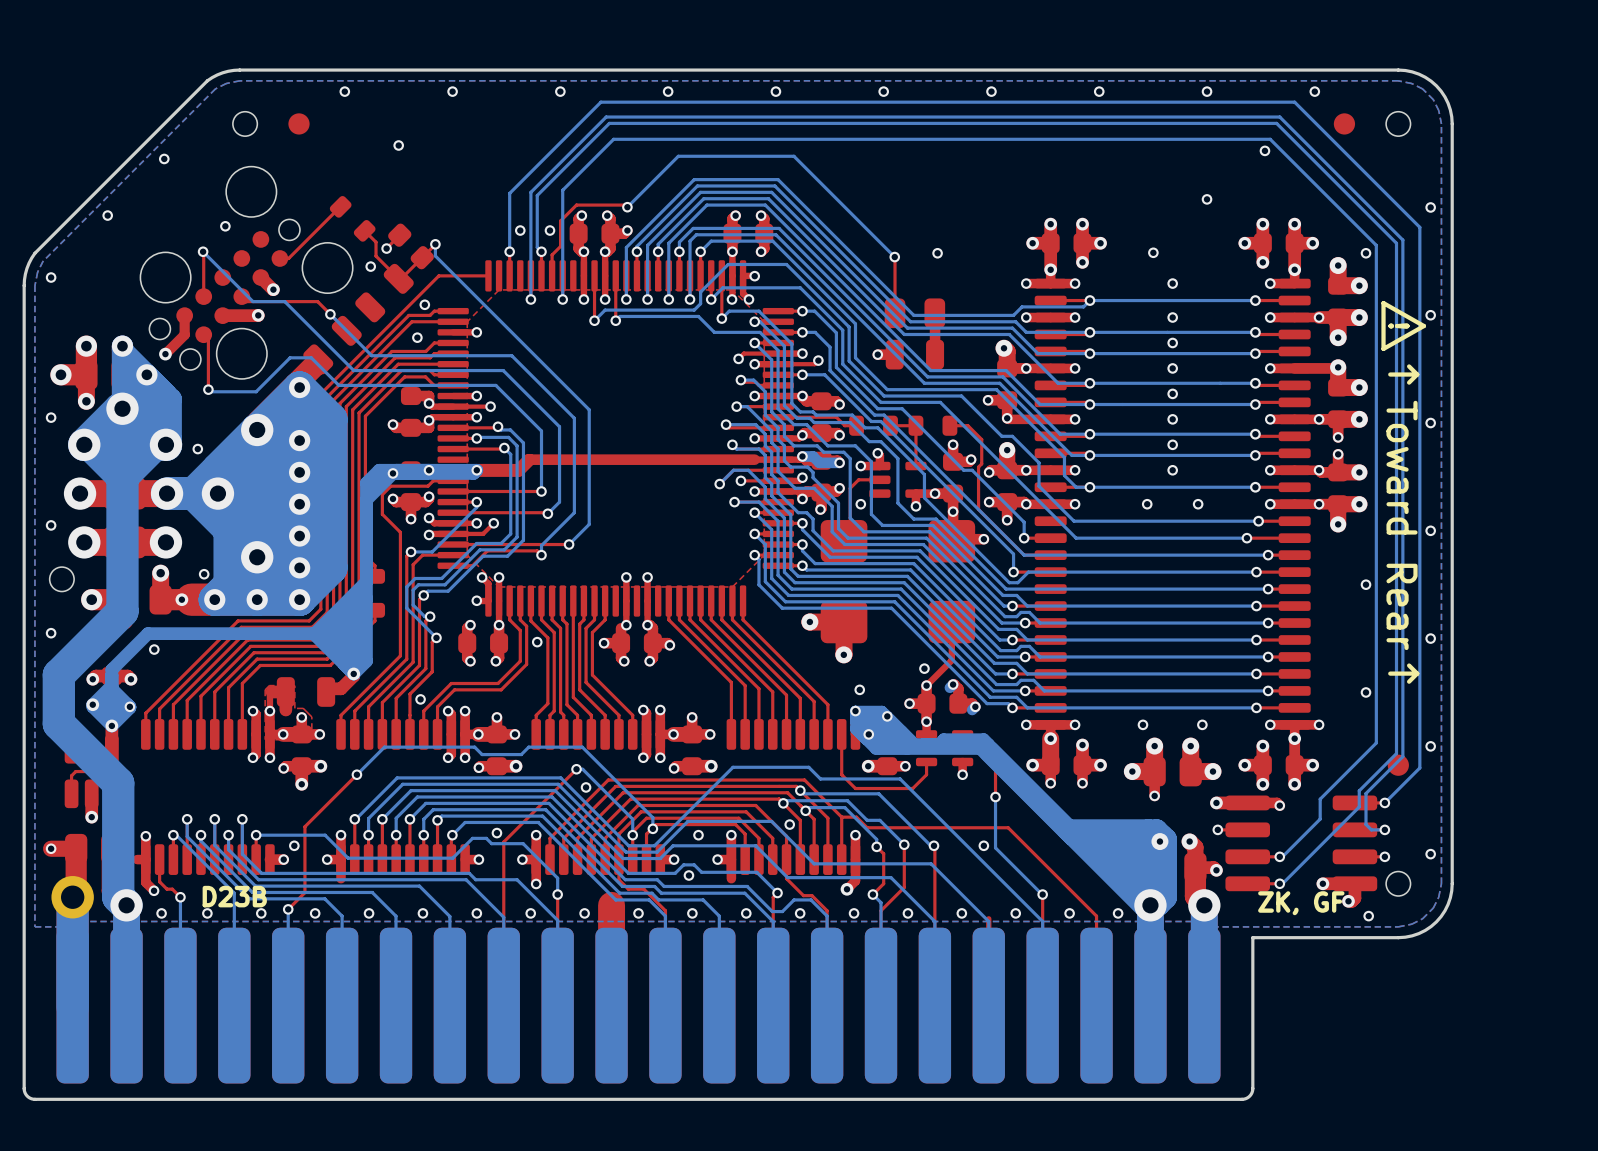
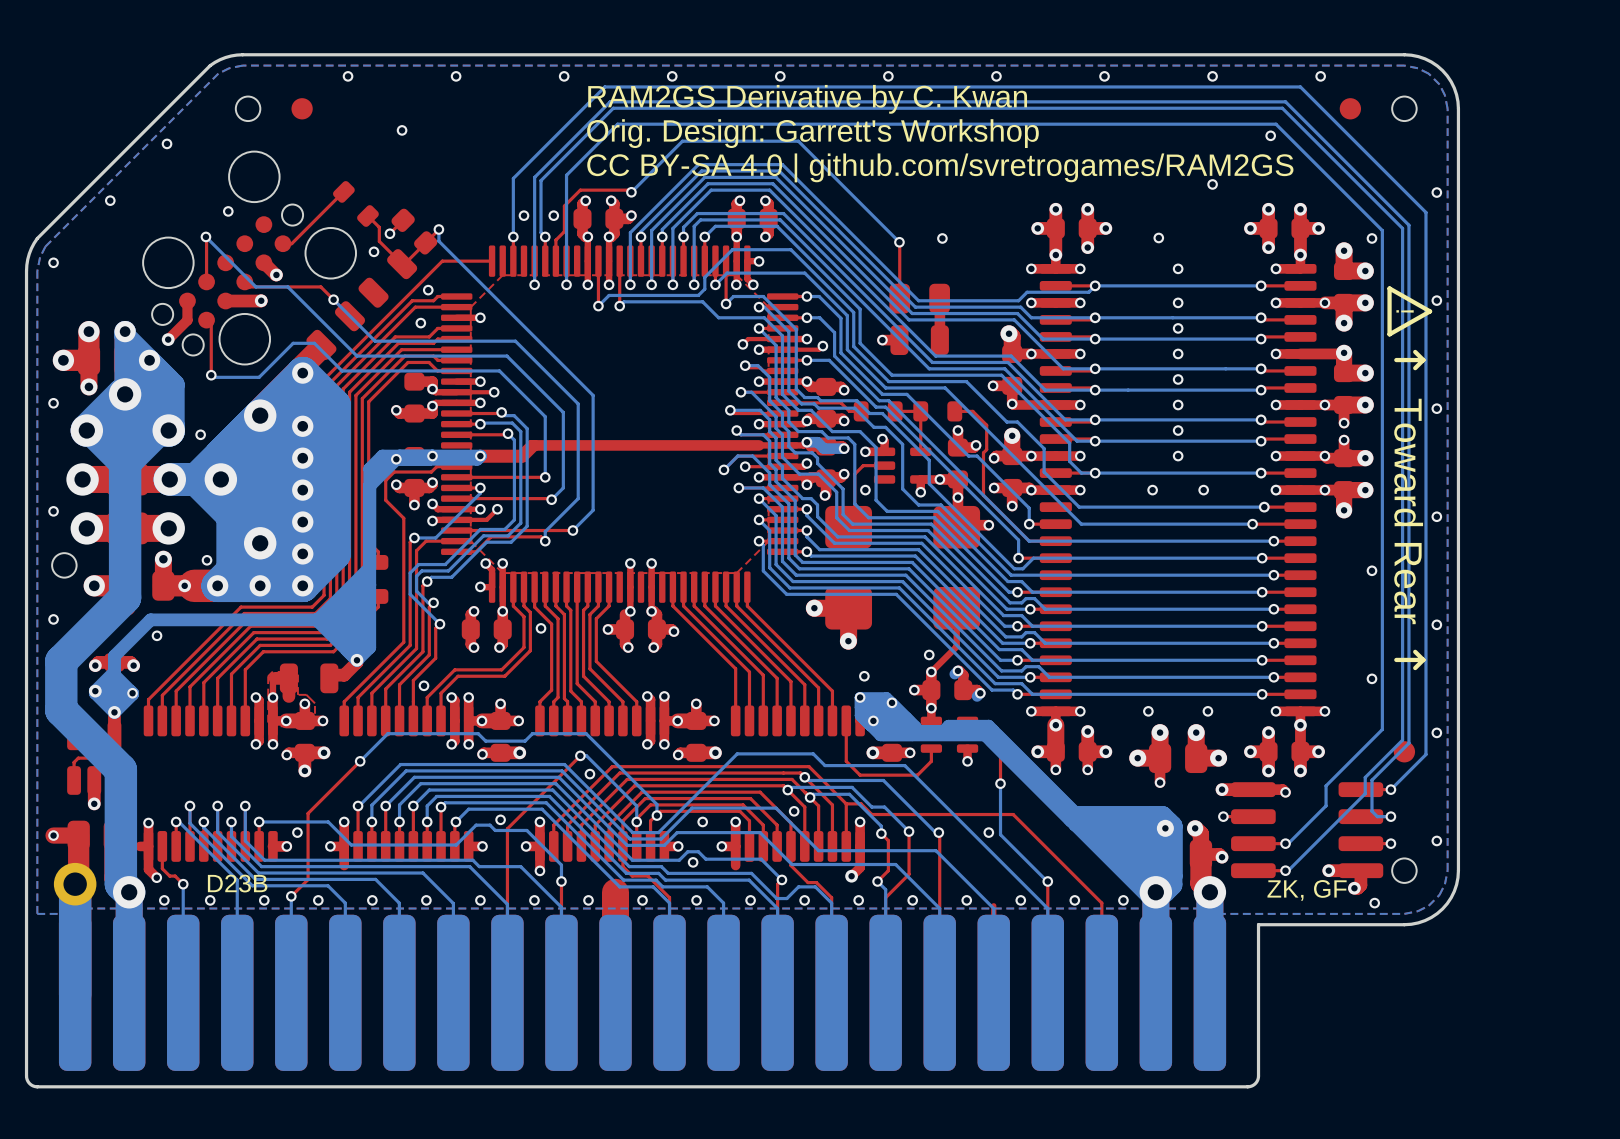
text: none -> RAM2GS Derivative by C. Kwan (807, 99)
text: none -> Orig. Design: Garrett's Workshop (812, 133)
text: none -> CC BY-SA 4.0 | github.com/svretrogames/RAM2GS (940, 167)

